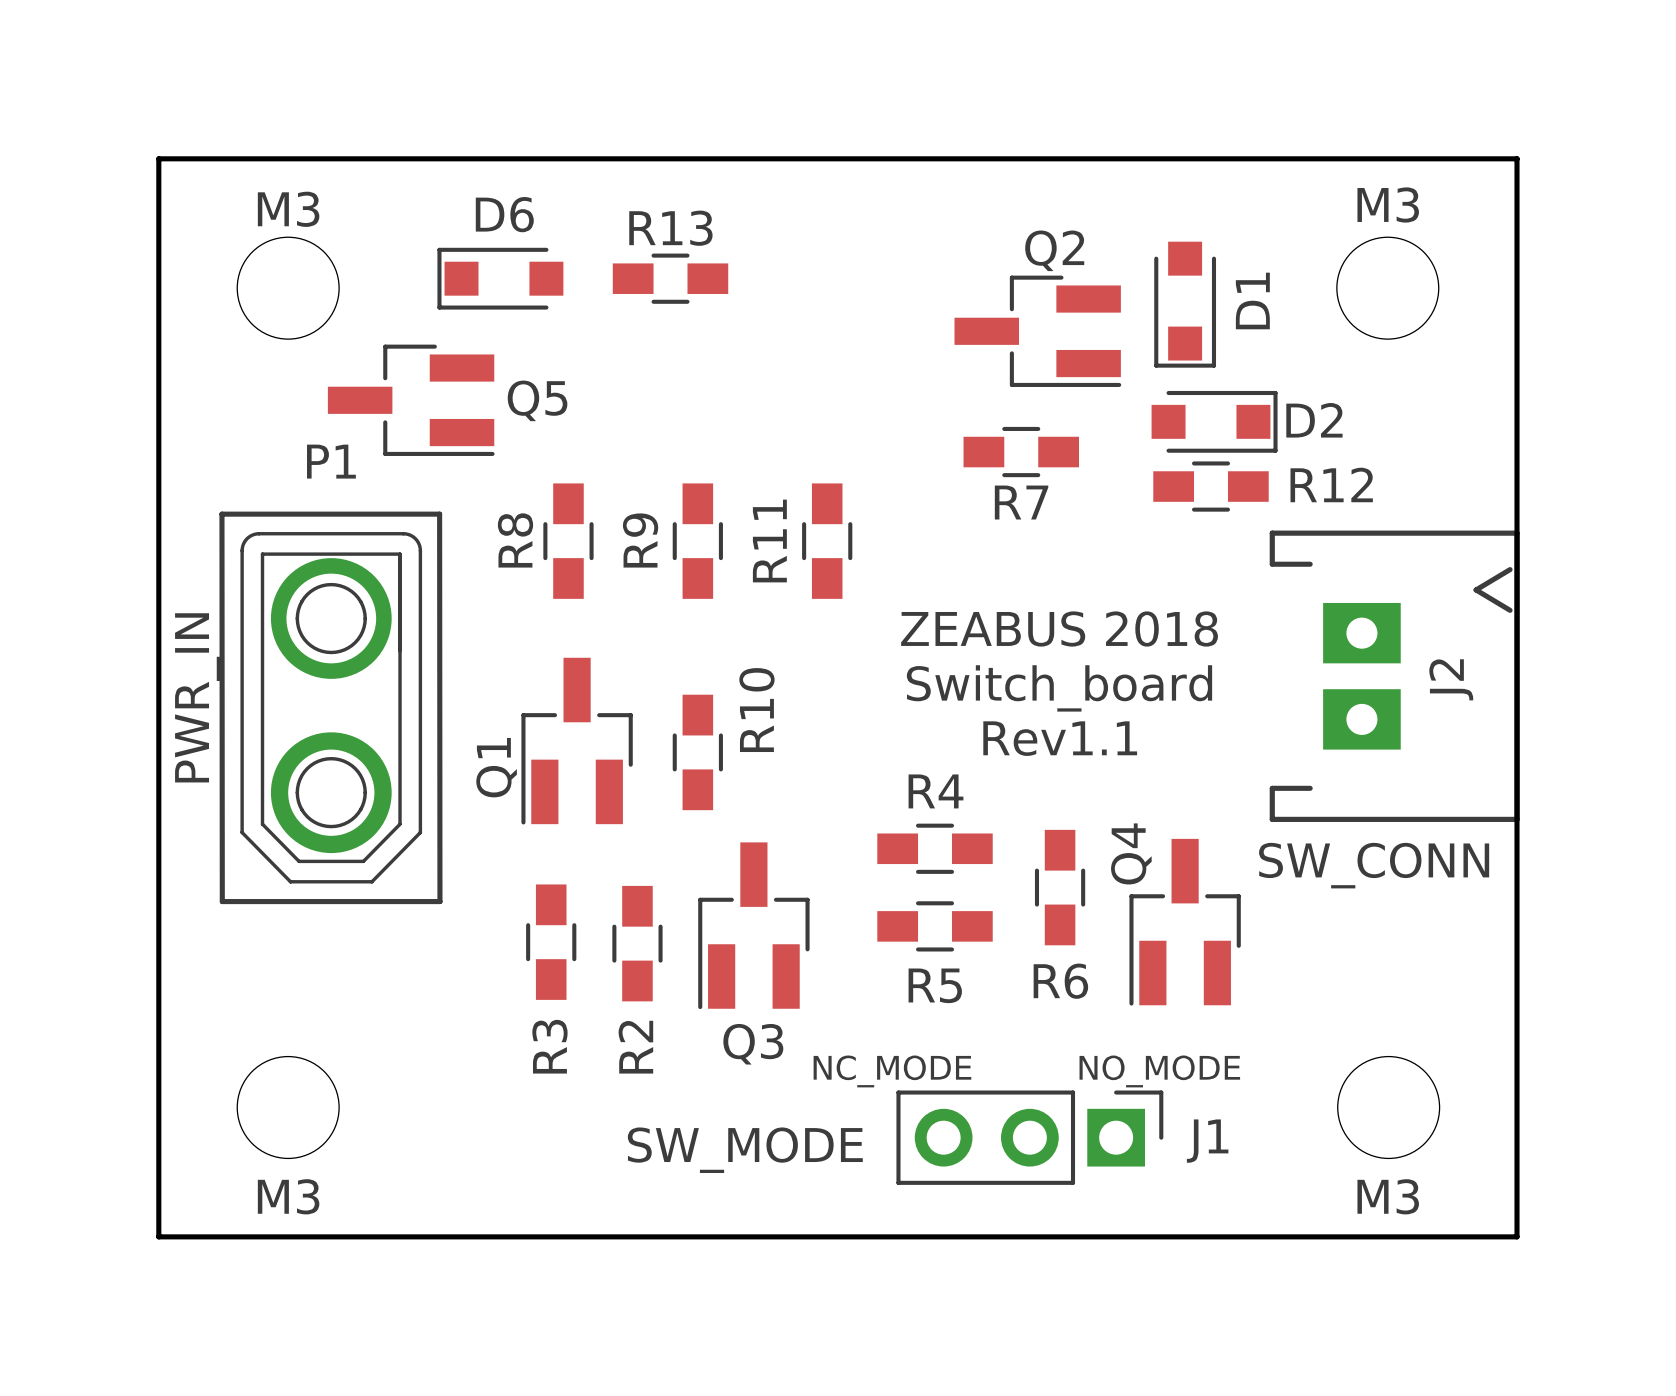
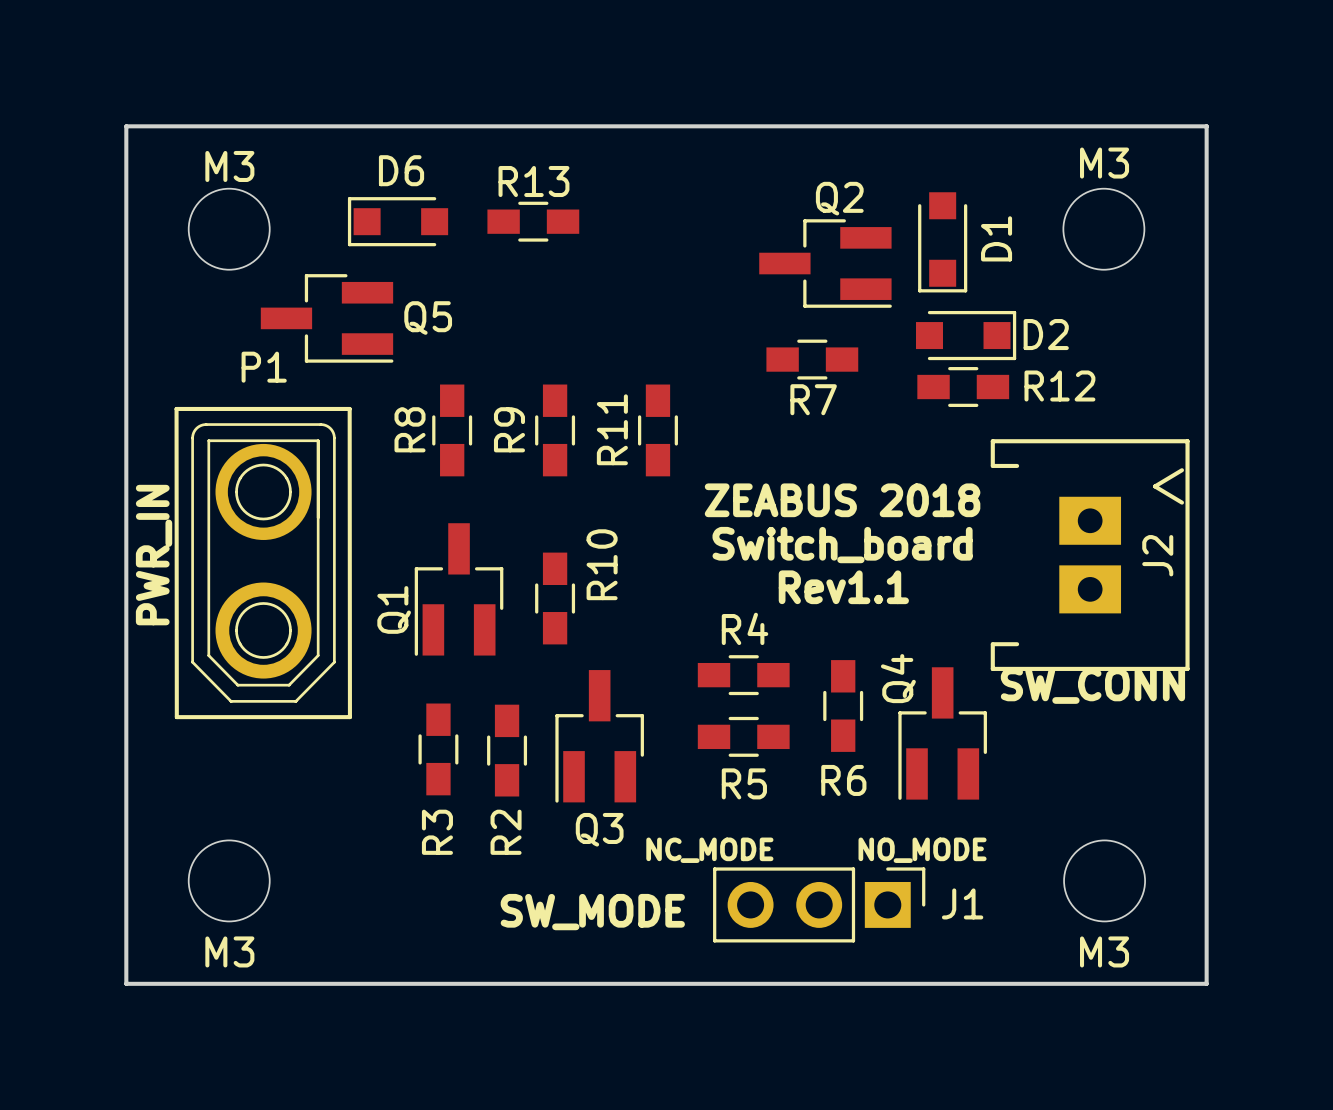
J2 footprint: [1269, 530, 1520, 822] -> [990, 439, 1190, 671]

